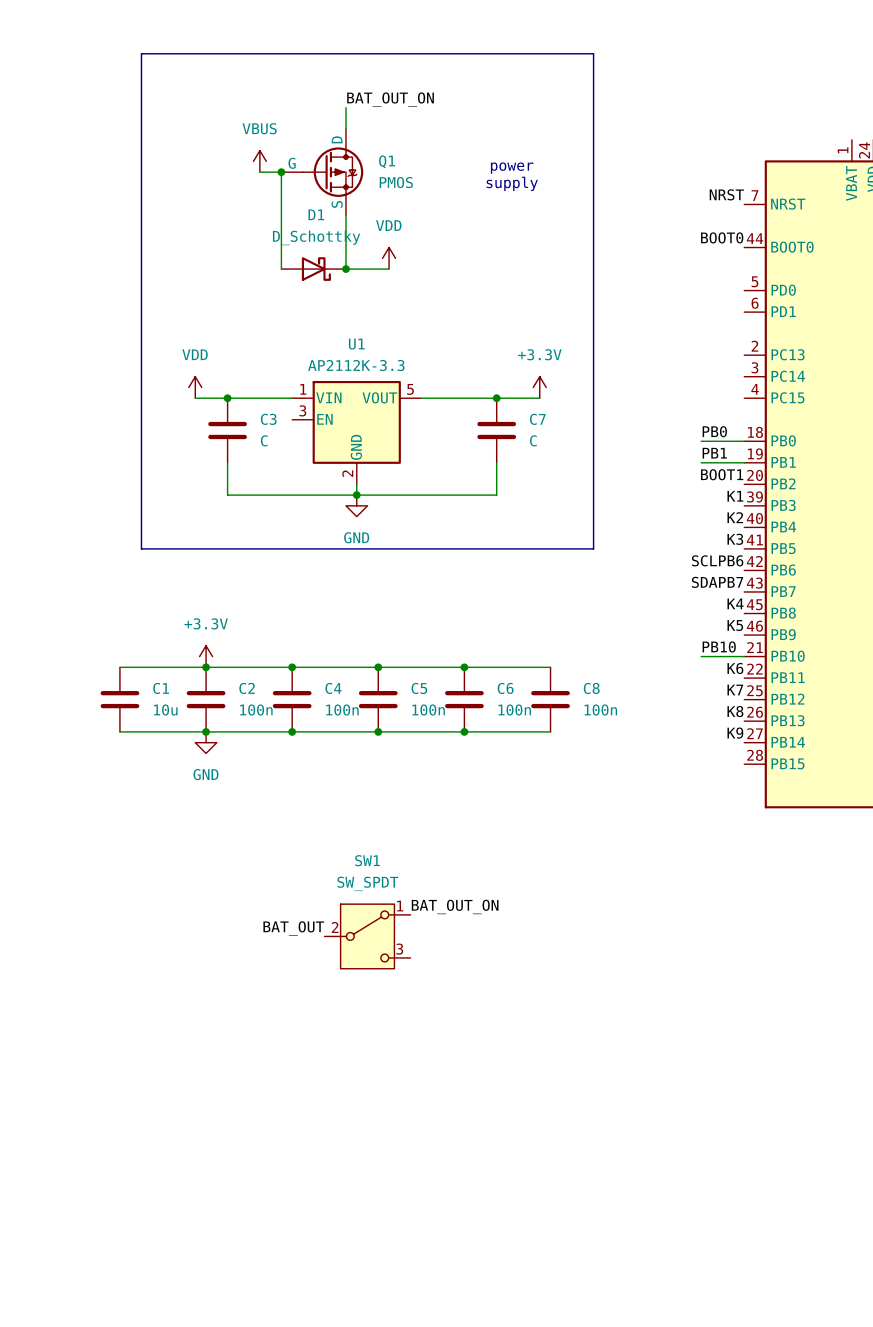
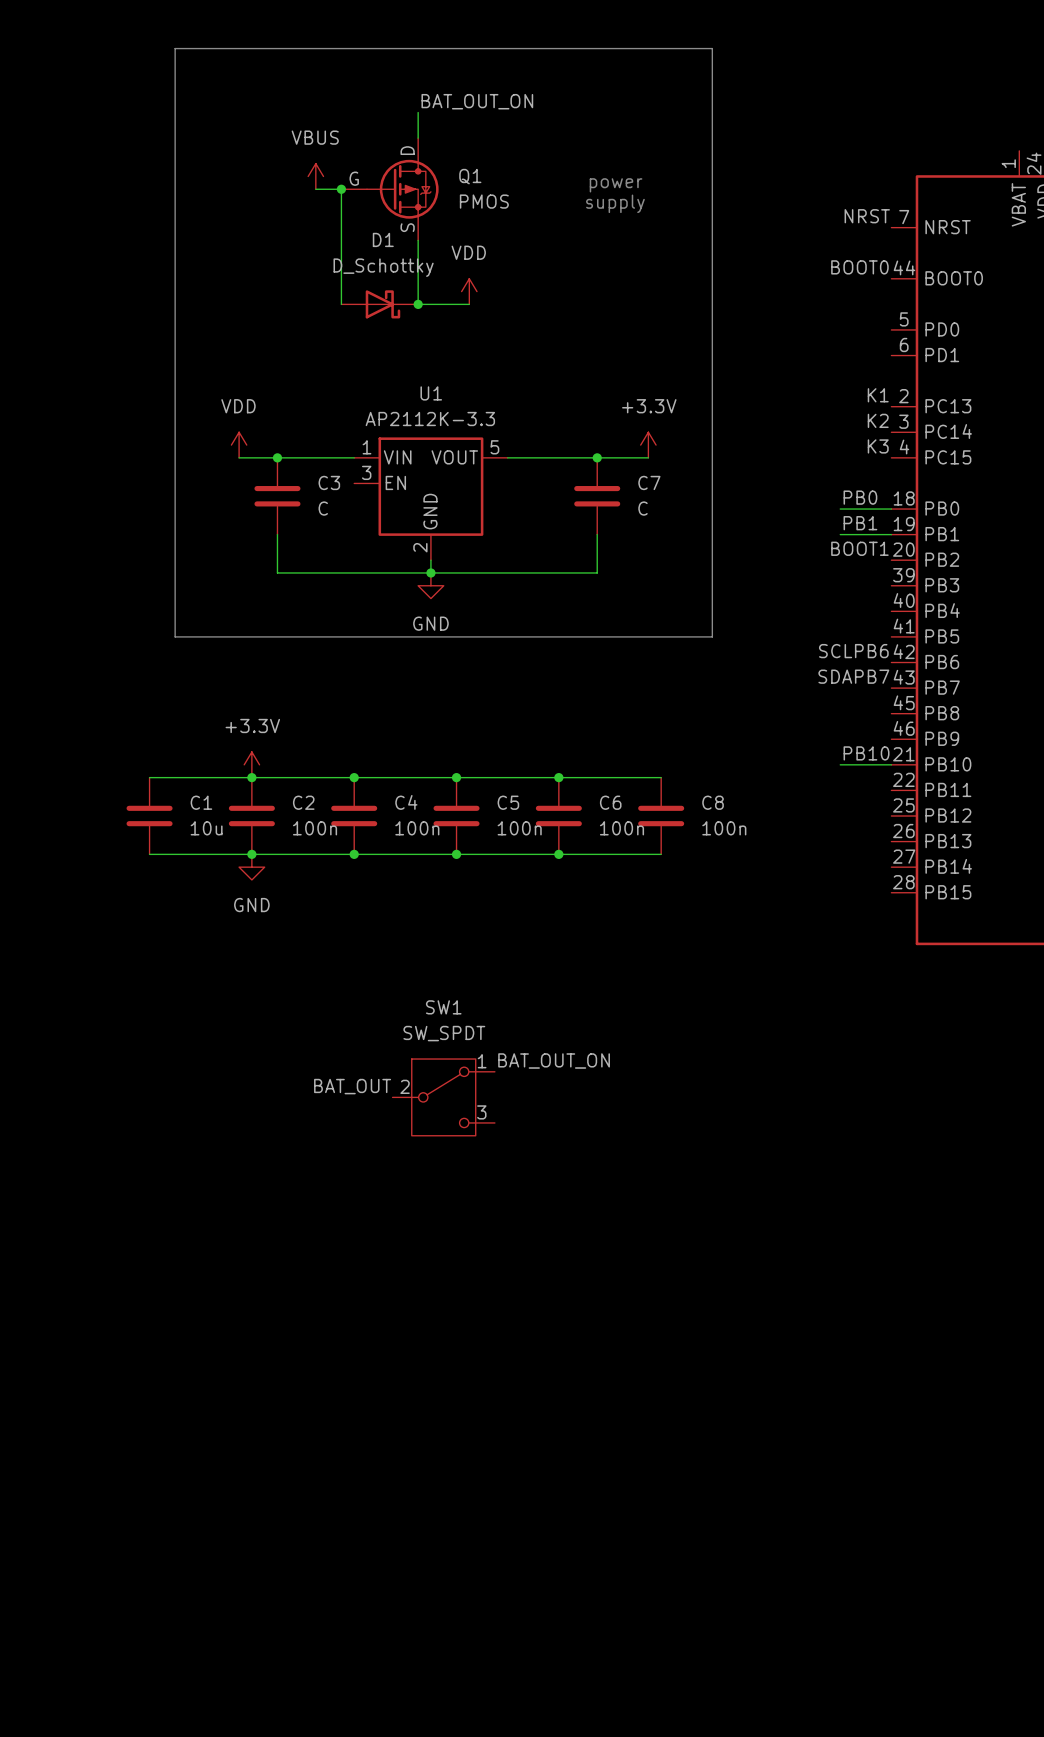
label position: K1 (735, 496) -> K1 (878, 395)
label position: K2 (735, 517) -> K2 (878, 420)
label position: K3 (735, 539) -> K3 (878, 446)
label: K4 (735, 603) -> none
label: K5 (735, 625) -> none
label: K6 (735, 668) -> none
label: K7 (735, 690) -> none
label: K8 (735, 711) -> none
label: K9 (735, 733) -> none

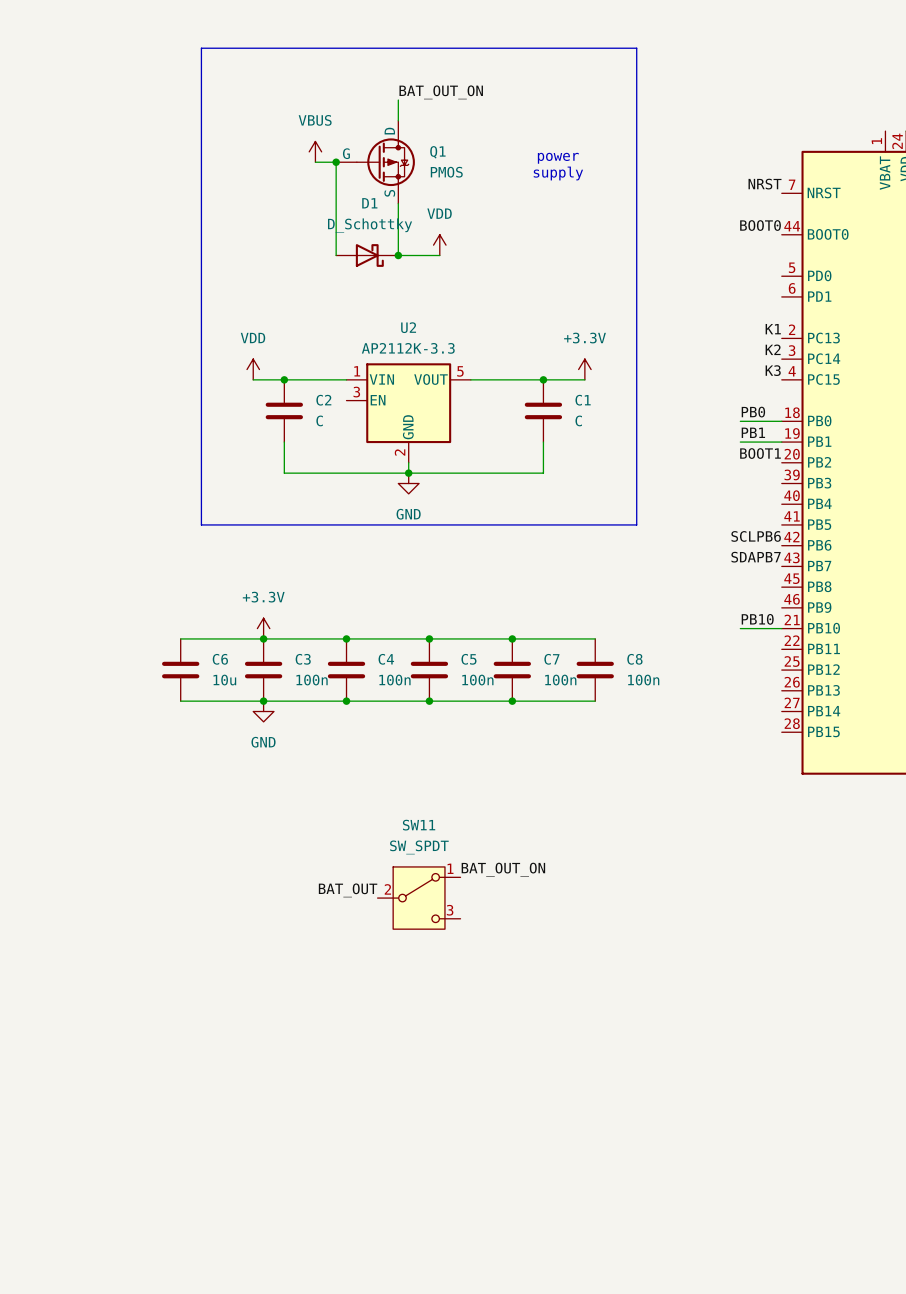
U1 name: U1 (431, 393) -> U2 (408, 327)
C3 name: C3 (329, 482) -> C2 (323, 400)
C7 name: C7 (649, 482) -> C1 (583, 400)
C1 name: C1 (201, 802) -> C6 (220, 659)
C2 name: C2 (303, 802) -> C3 (303, 659)
C6 name: C6 (610, 802) -> C7 (551, 659)
SW1 name: SW1 (443, 1007) -> SW11 (419, 825)

